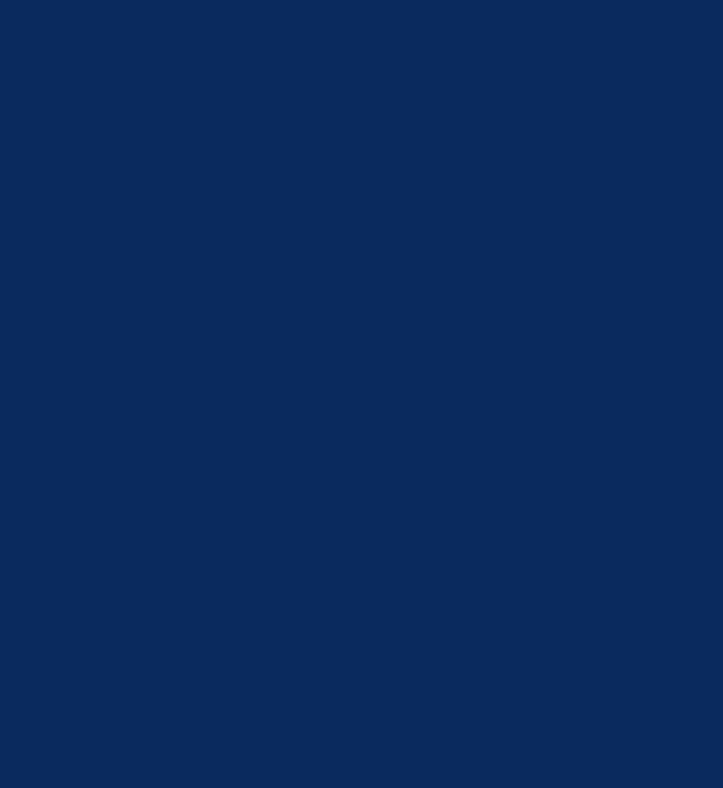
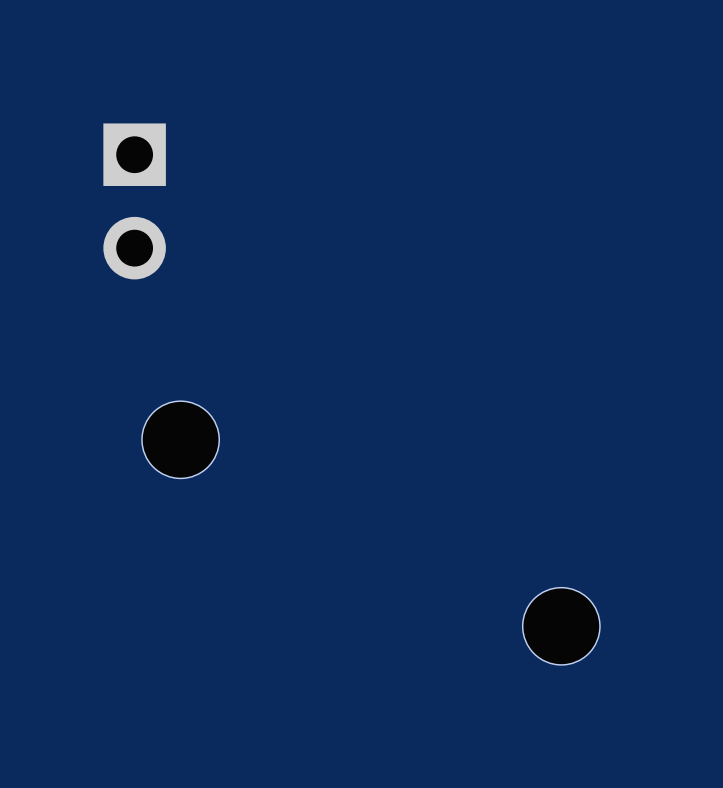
part: none -> (134, 201)
part: none -> (180, 439)
part: none -> (561, 626)

